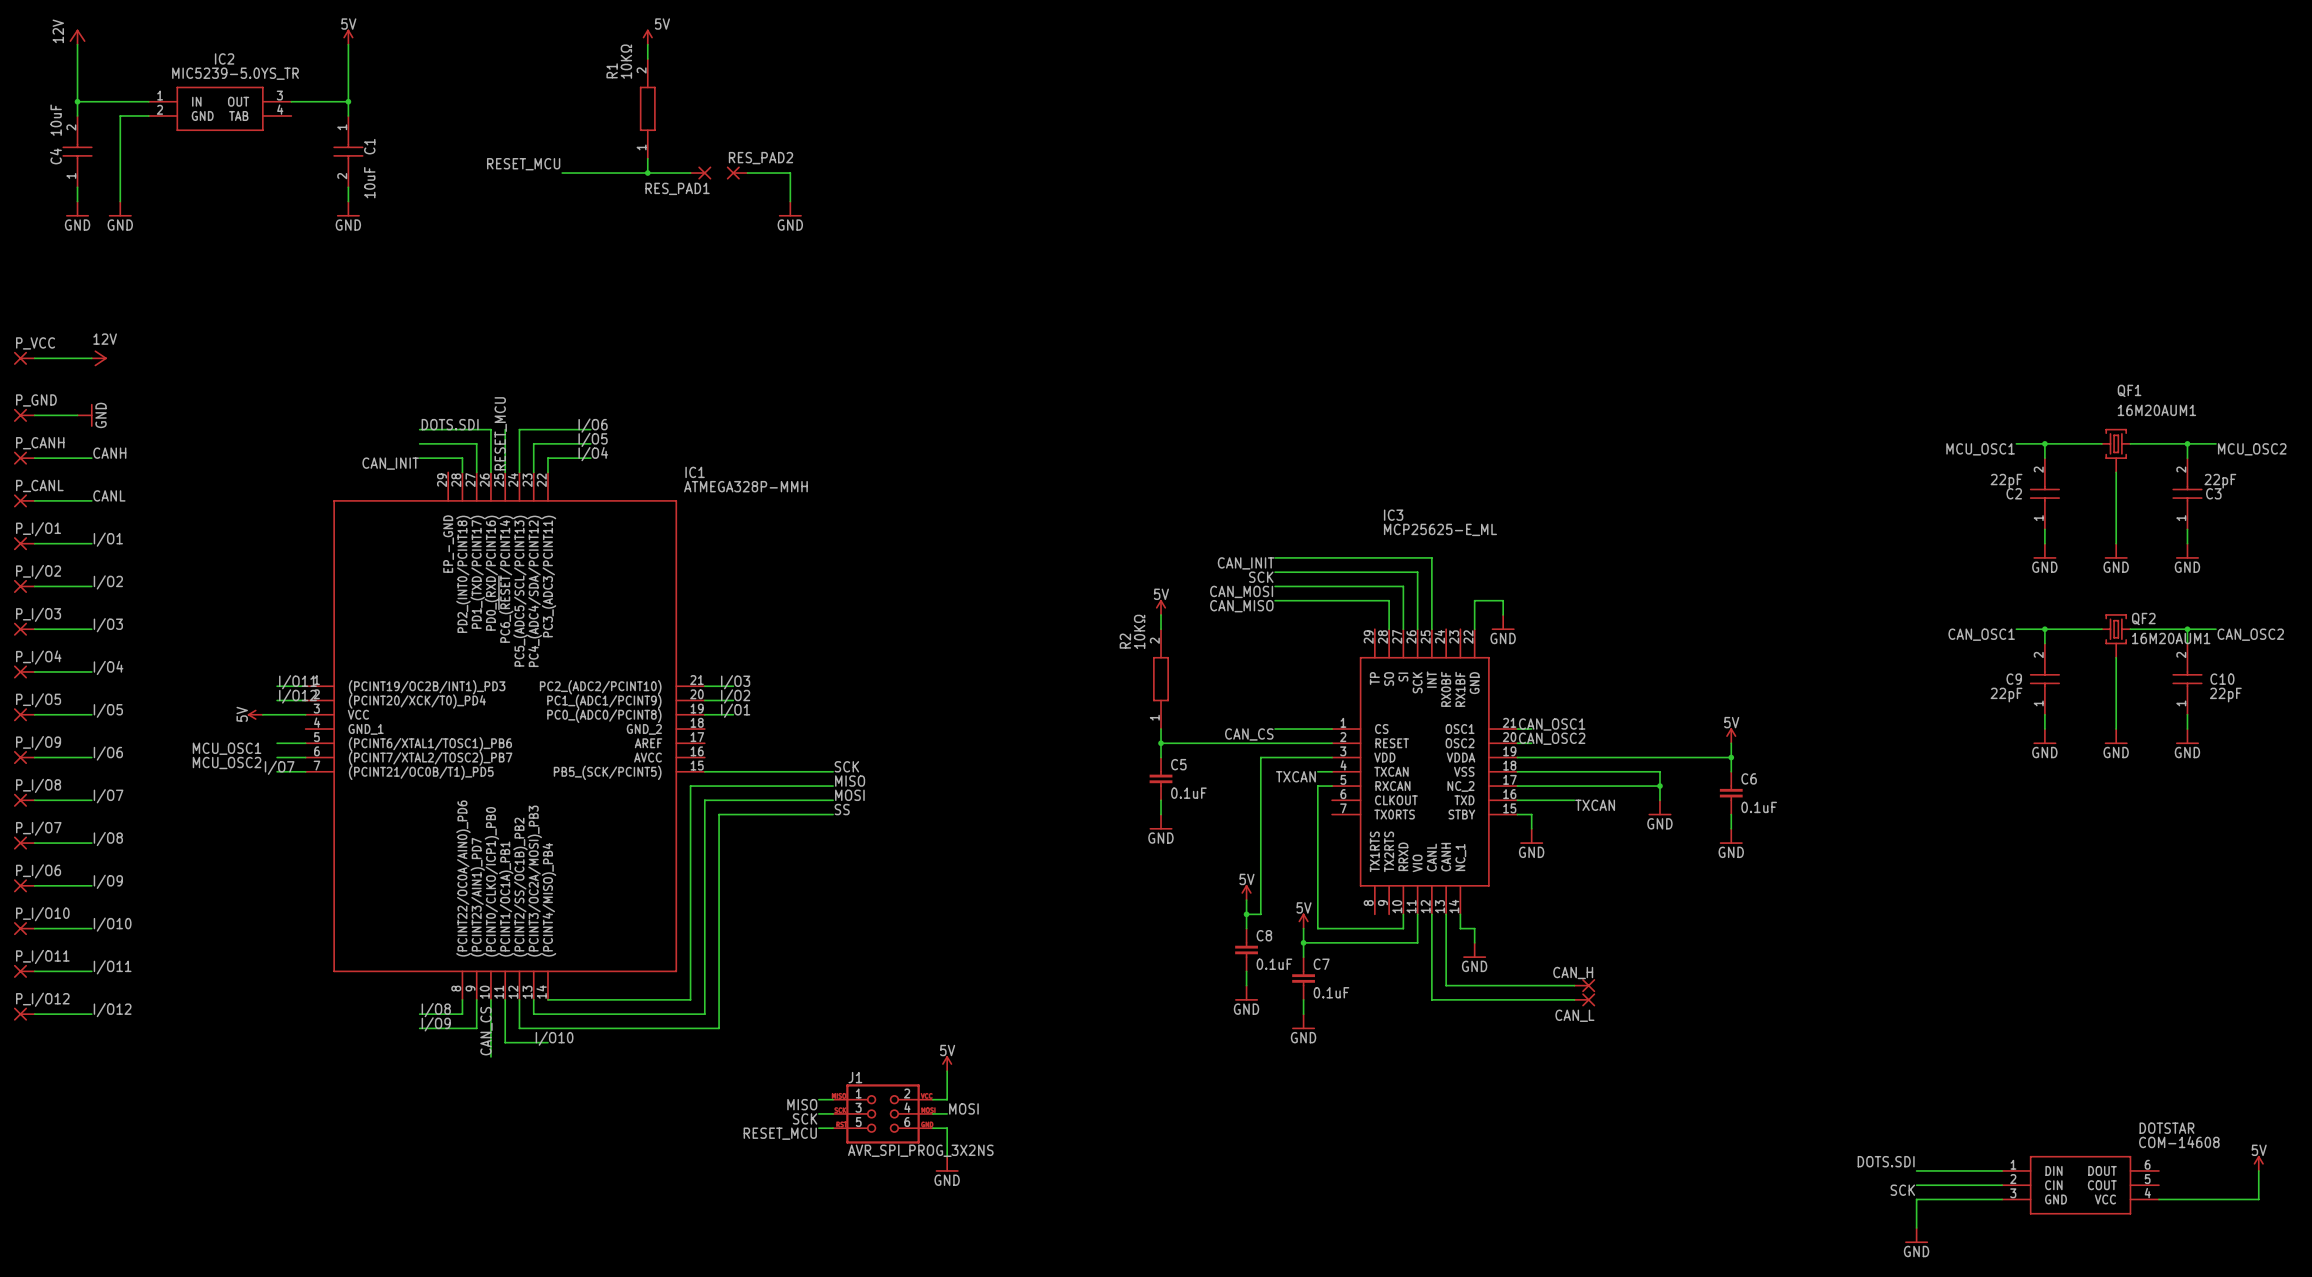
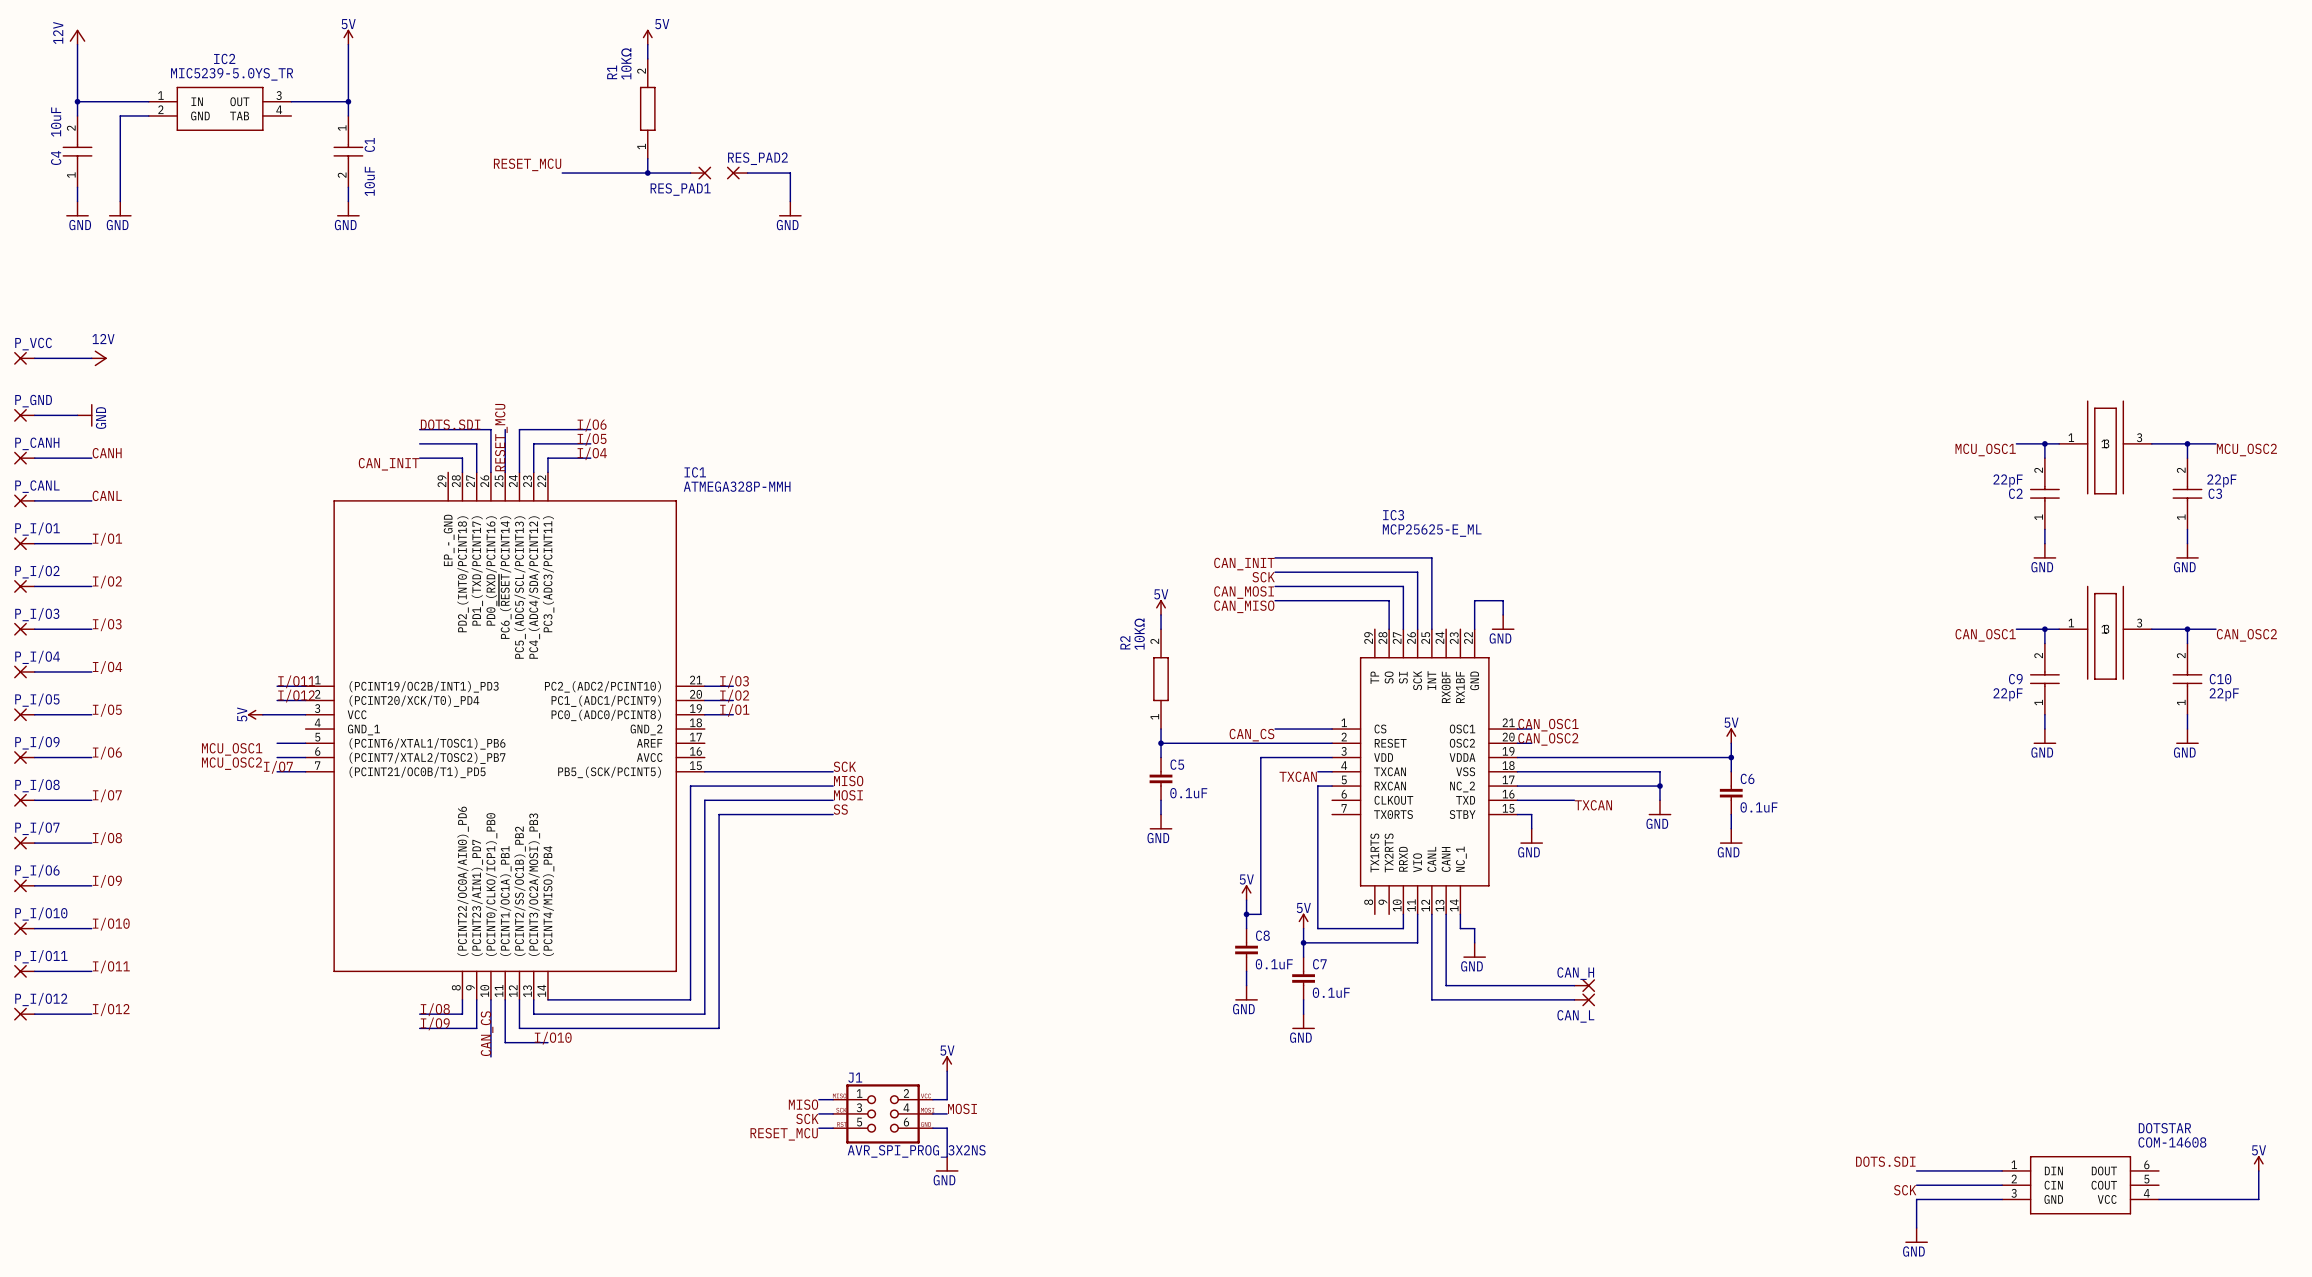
part: none -> (2105, 447)
QF1: 16M20AUM1 (2116, 450) -> none
wire: (2116, 472) (2116, 543) -> none
power symbol: GND (2116, 551) -> none
part: none -> (2105, 632)
QF2: 16M20AUM1 (2116, 636) -> none
wire: (2116, 657) (2116, 729) -> none
power symbol: GND (2116, 736) -> none

